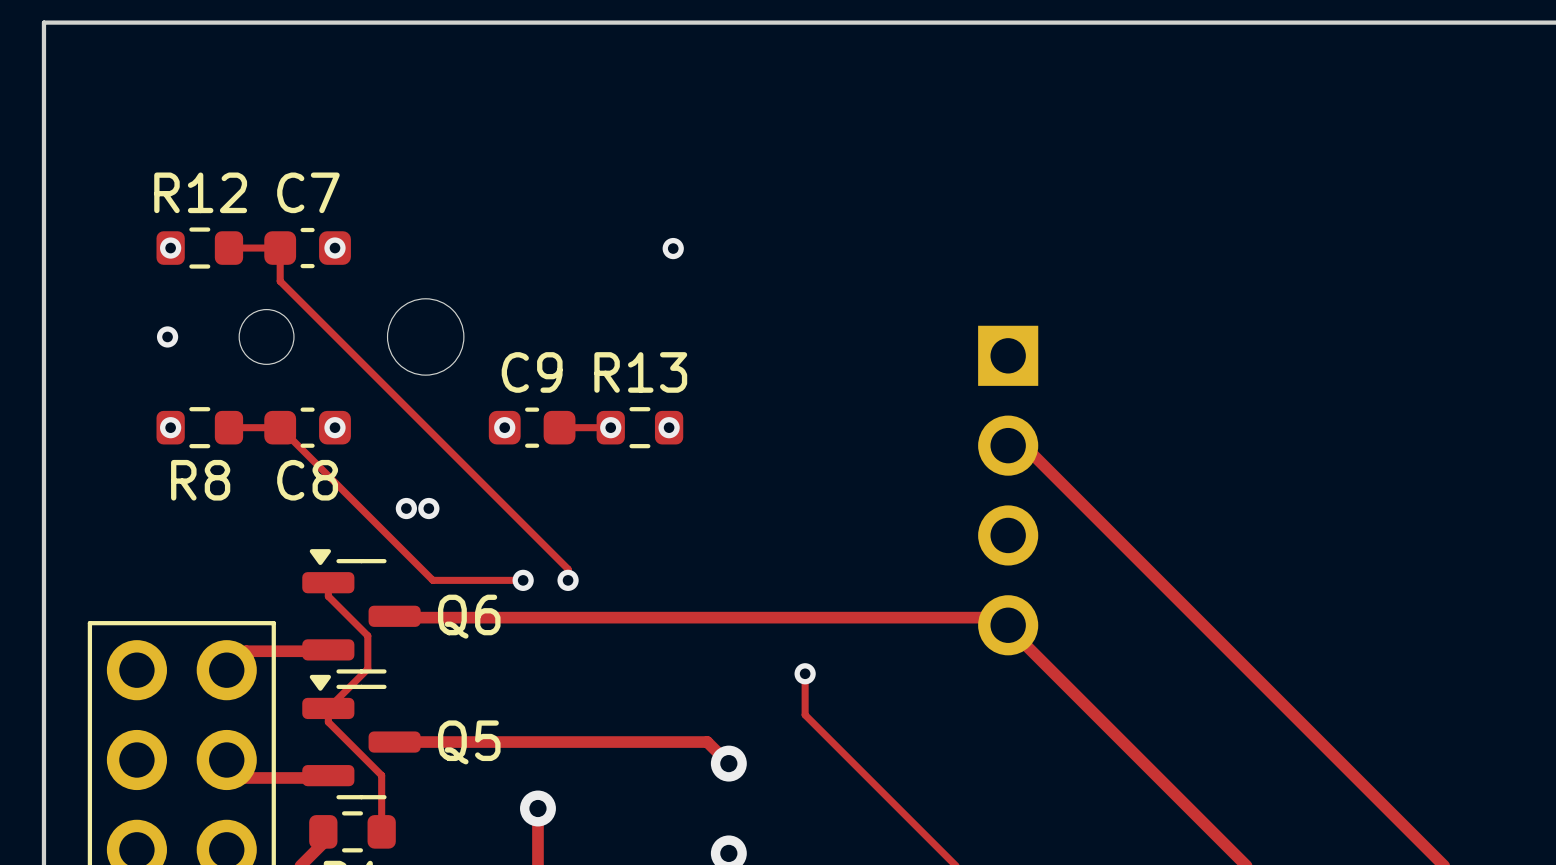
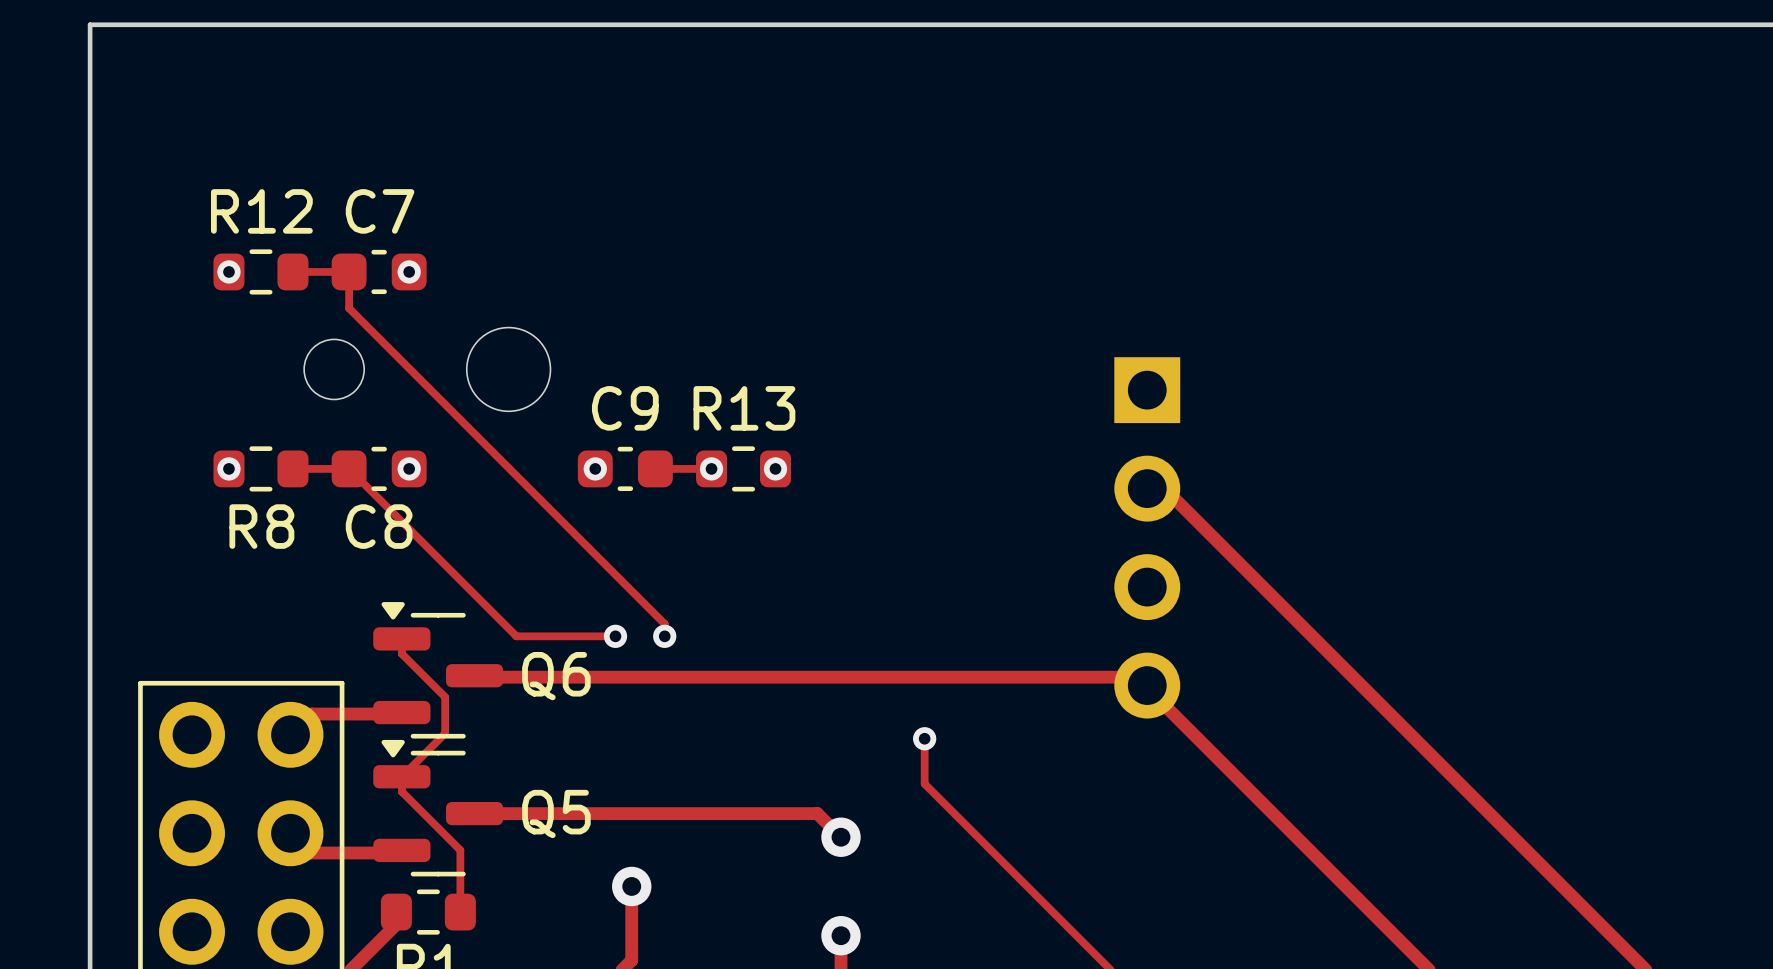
via: (673, 248) -> none
via: (167, 336) -> none
via: (406, 508) -> none
via: (428, 508) -> none

